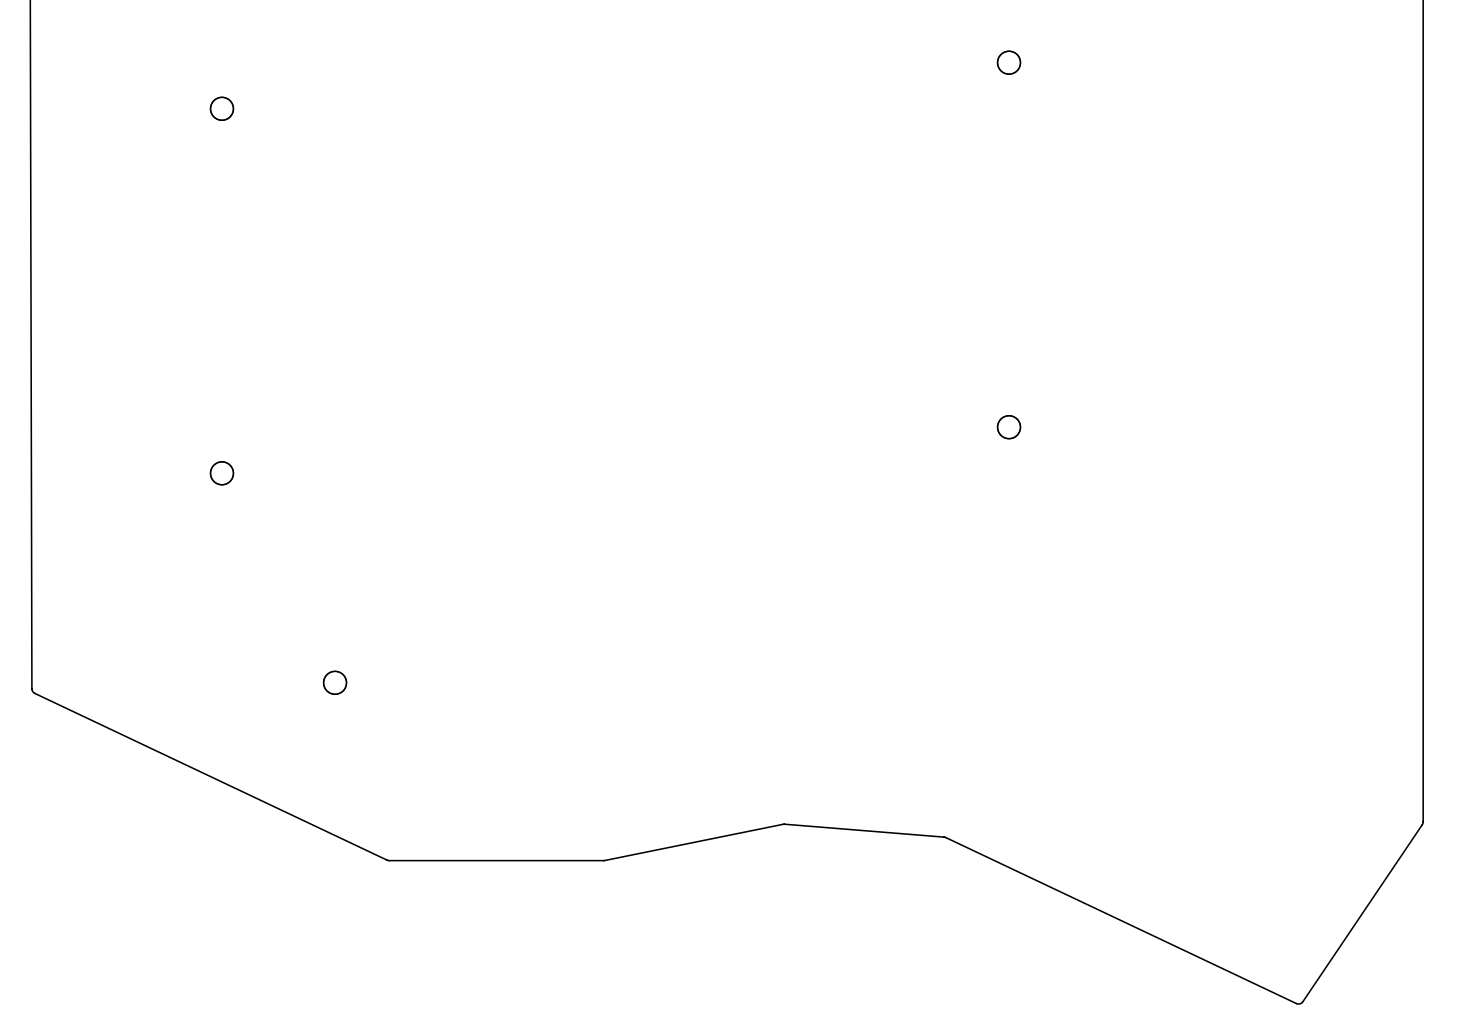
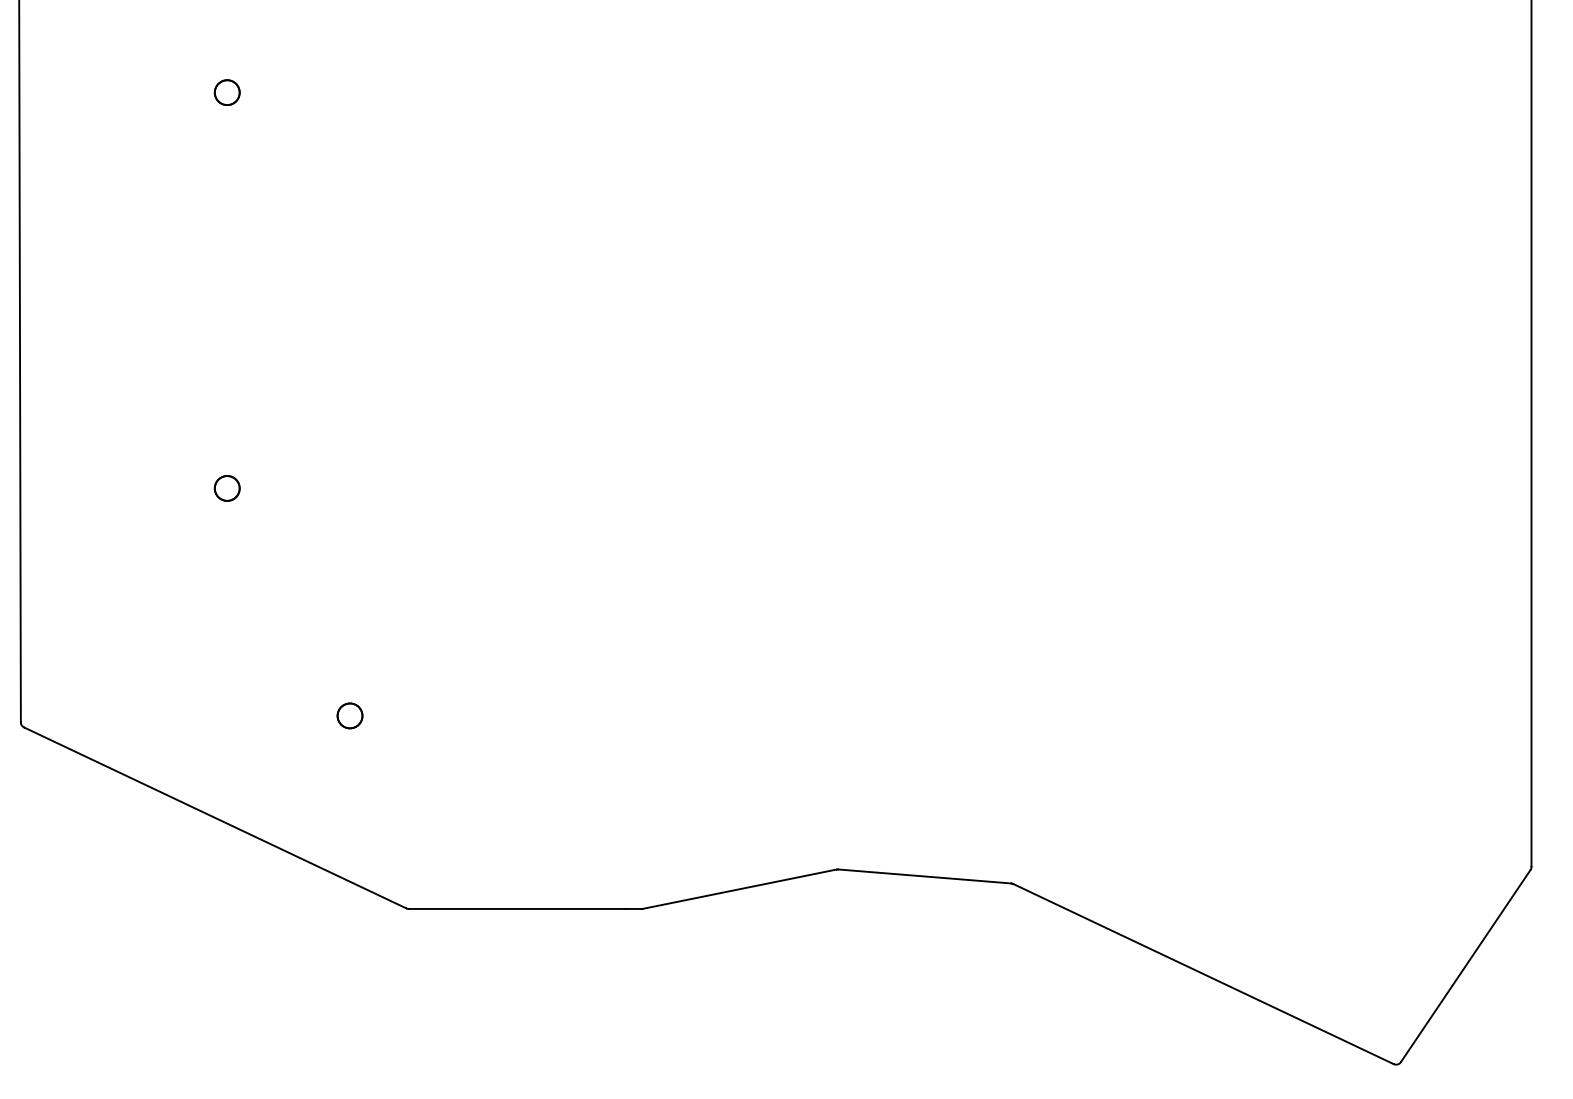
round board edge: [996, 50, 1022, 75] -> none
round board edge: [996, 414, 1022, 440] -> none

